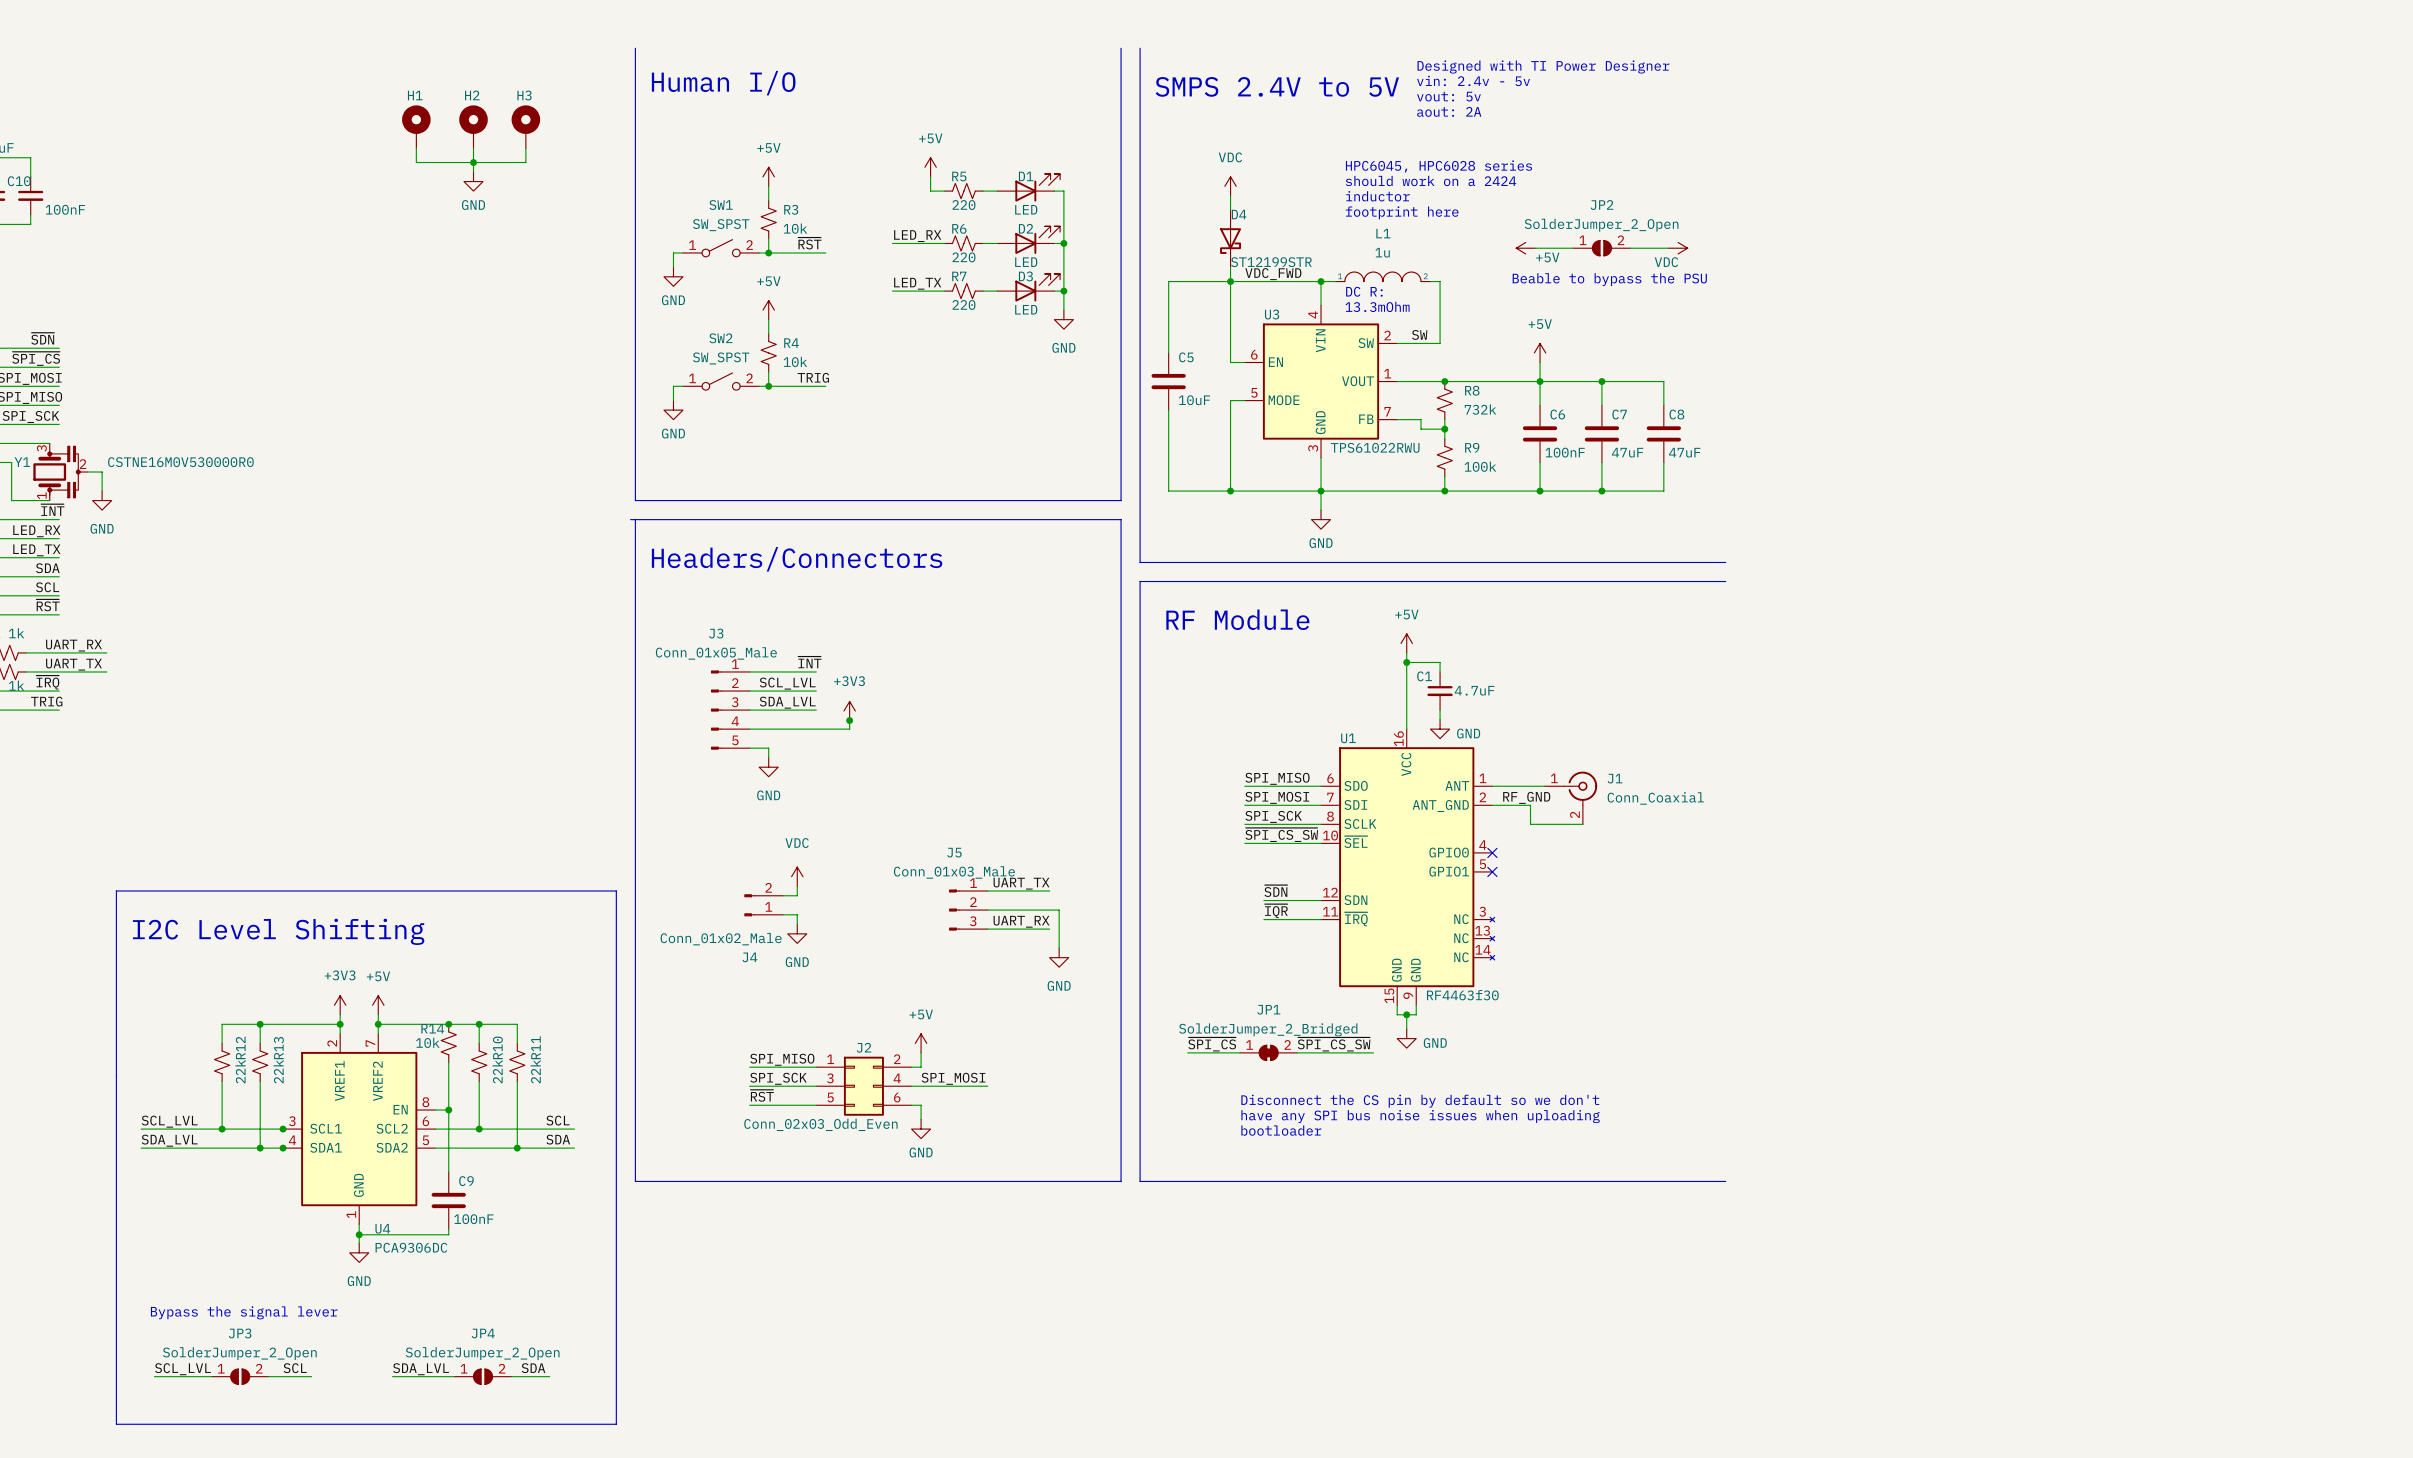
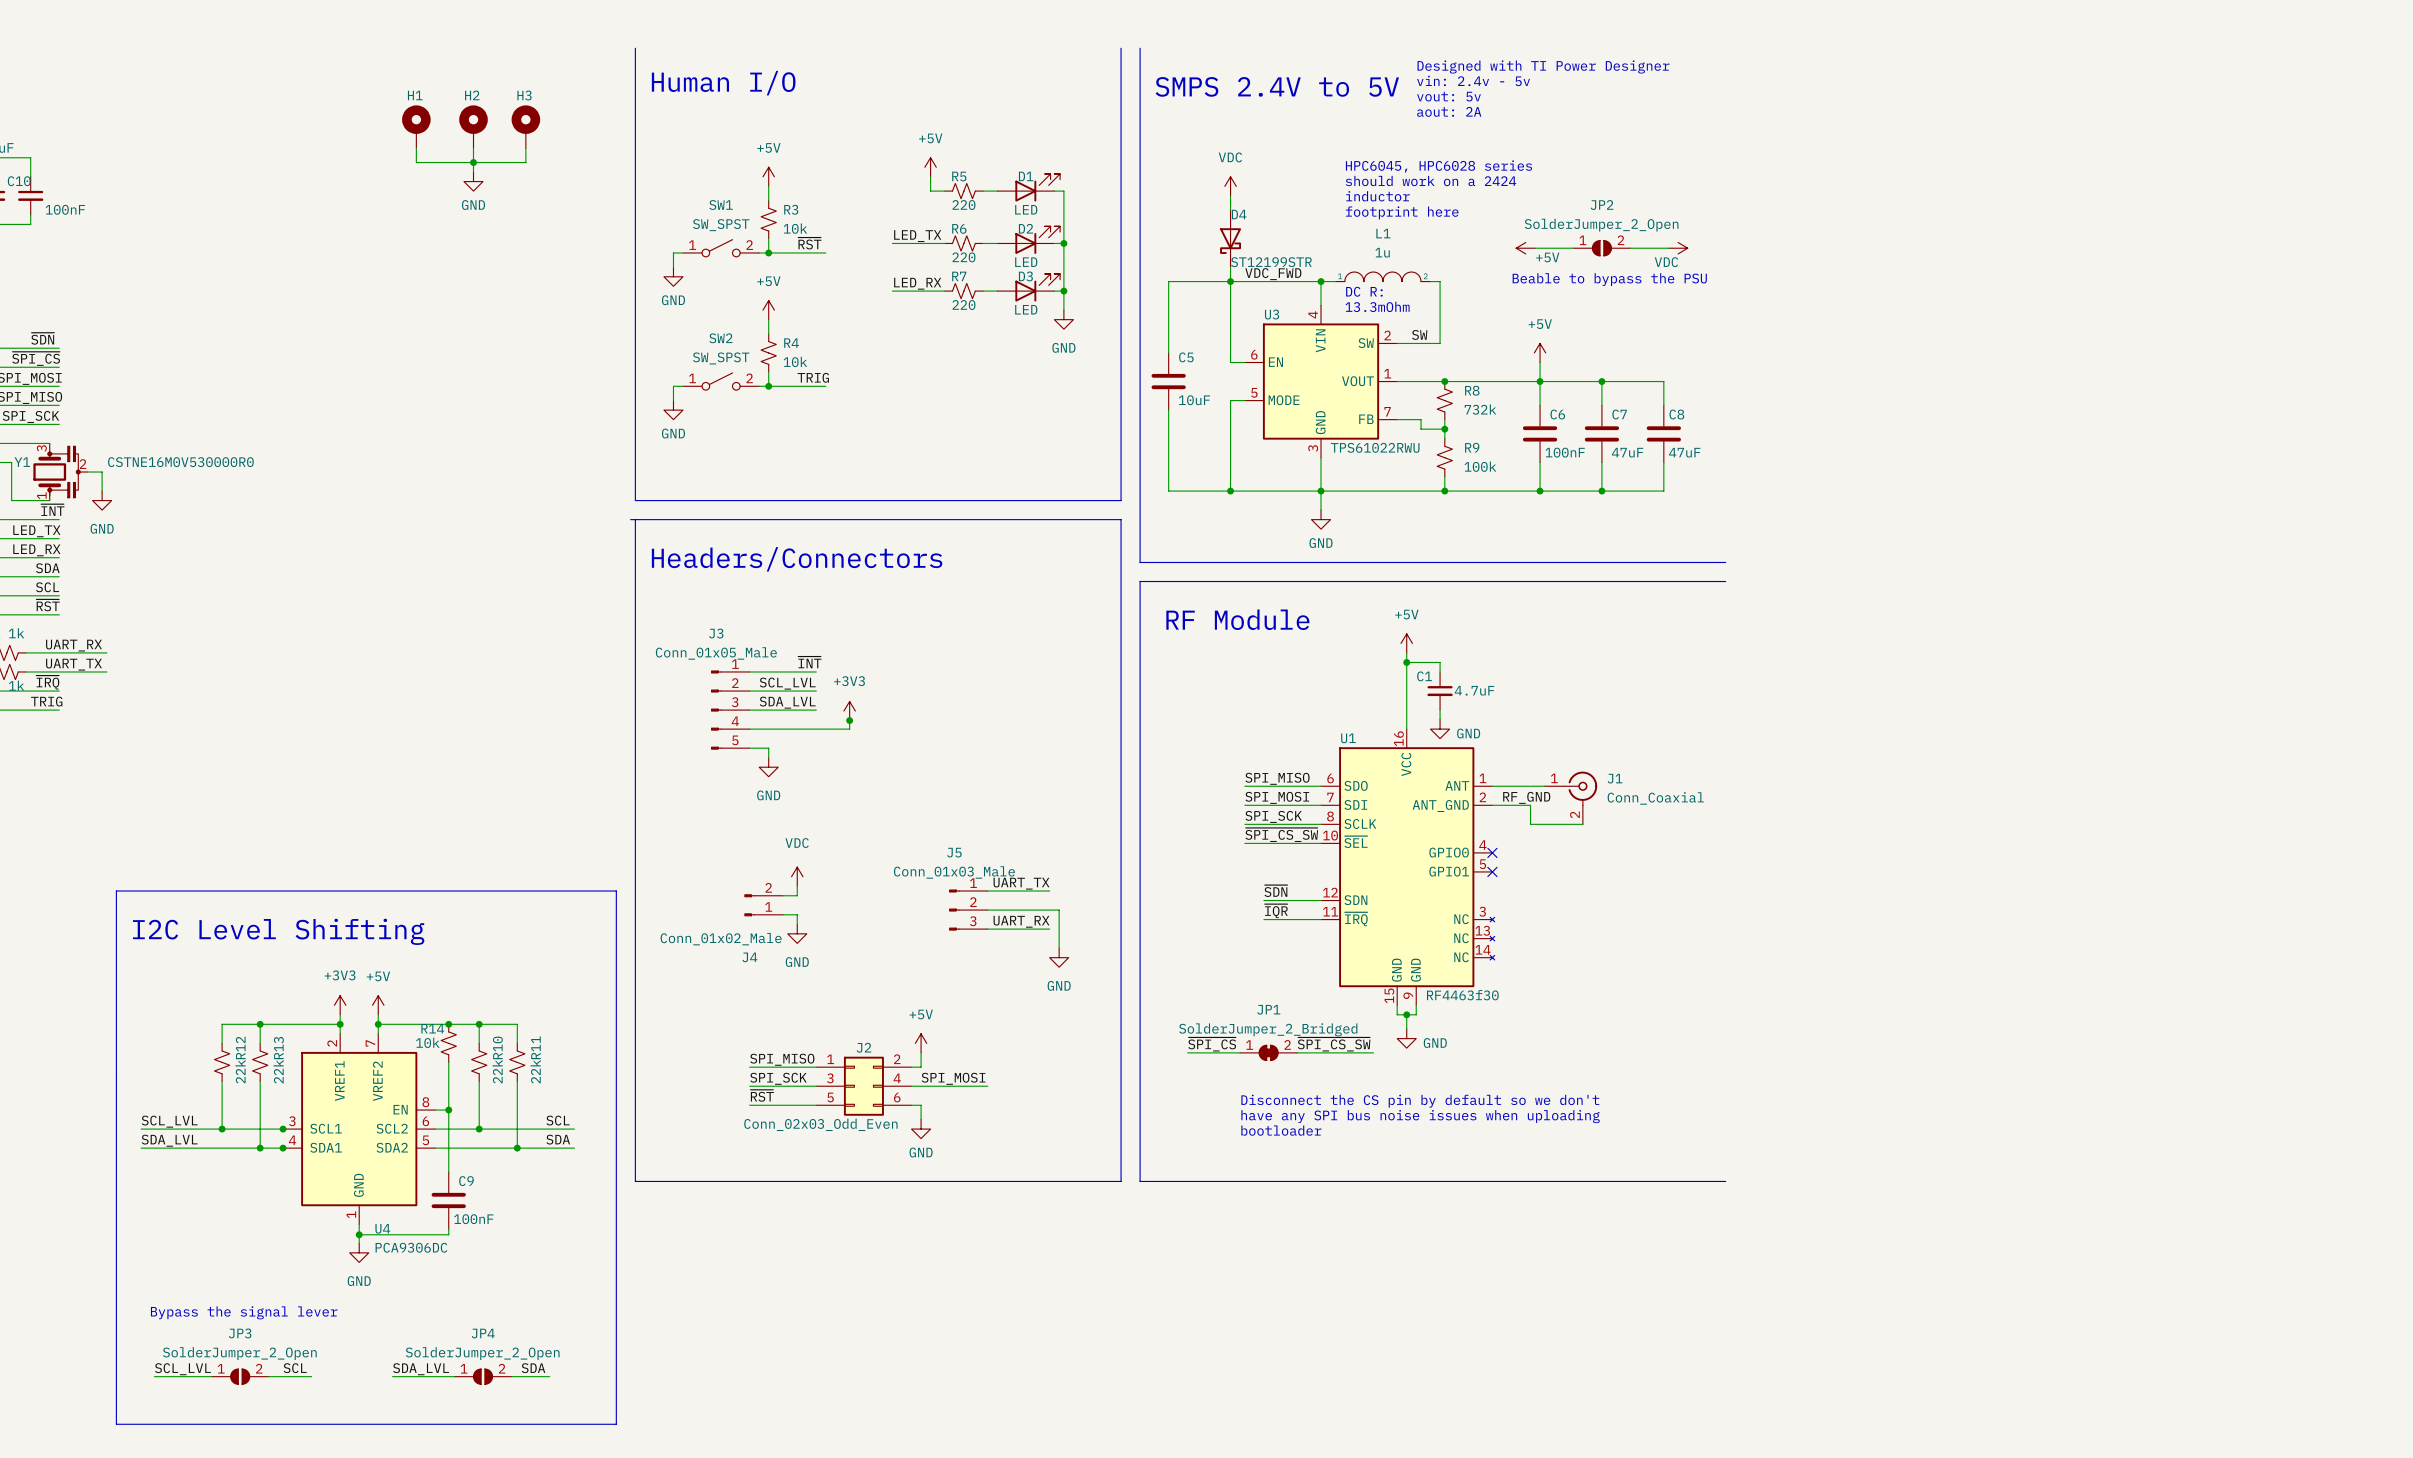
label: LED_RX (917, 236) -> LED_TX (917, 236)
label: LED_TX (917, 283) -> LED_RX (917, 283)
label: LED_RX (36, 531) -> LED_TX (36, 531)
label: LED_TX (36, 550) -> LED_RX (36, 550)

